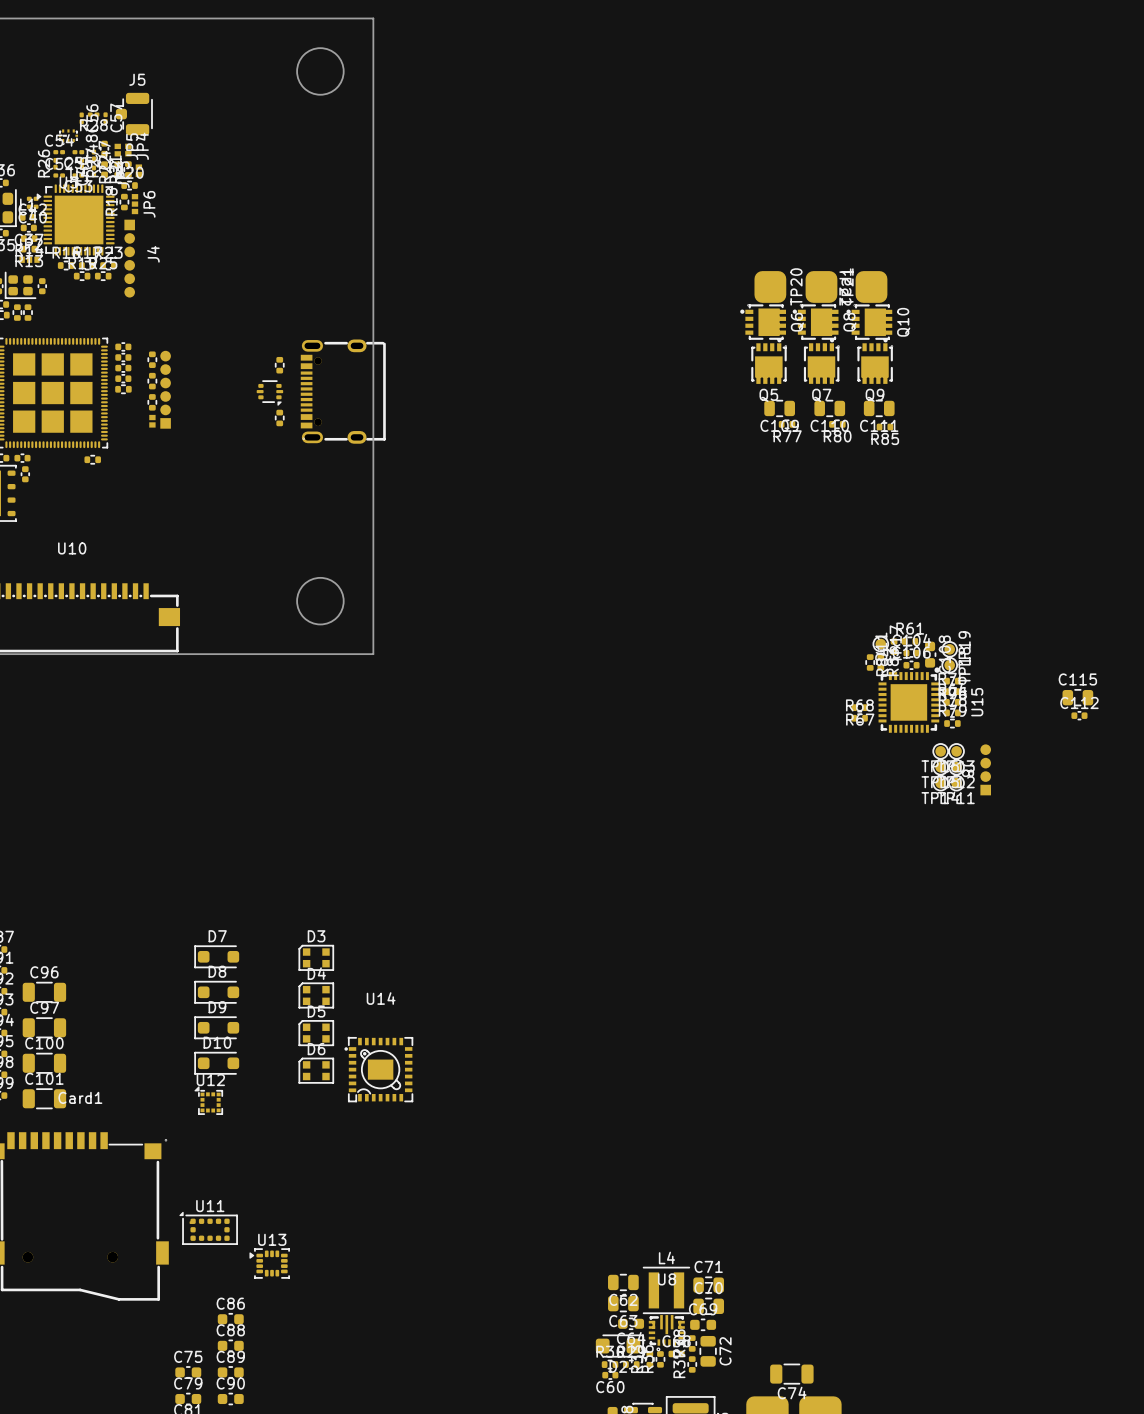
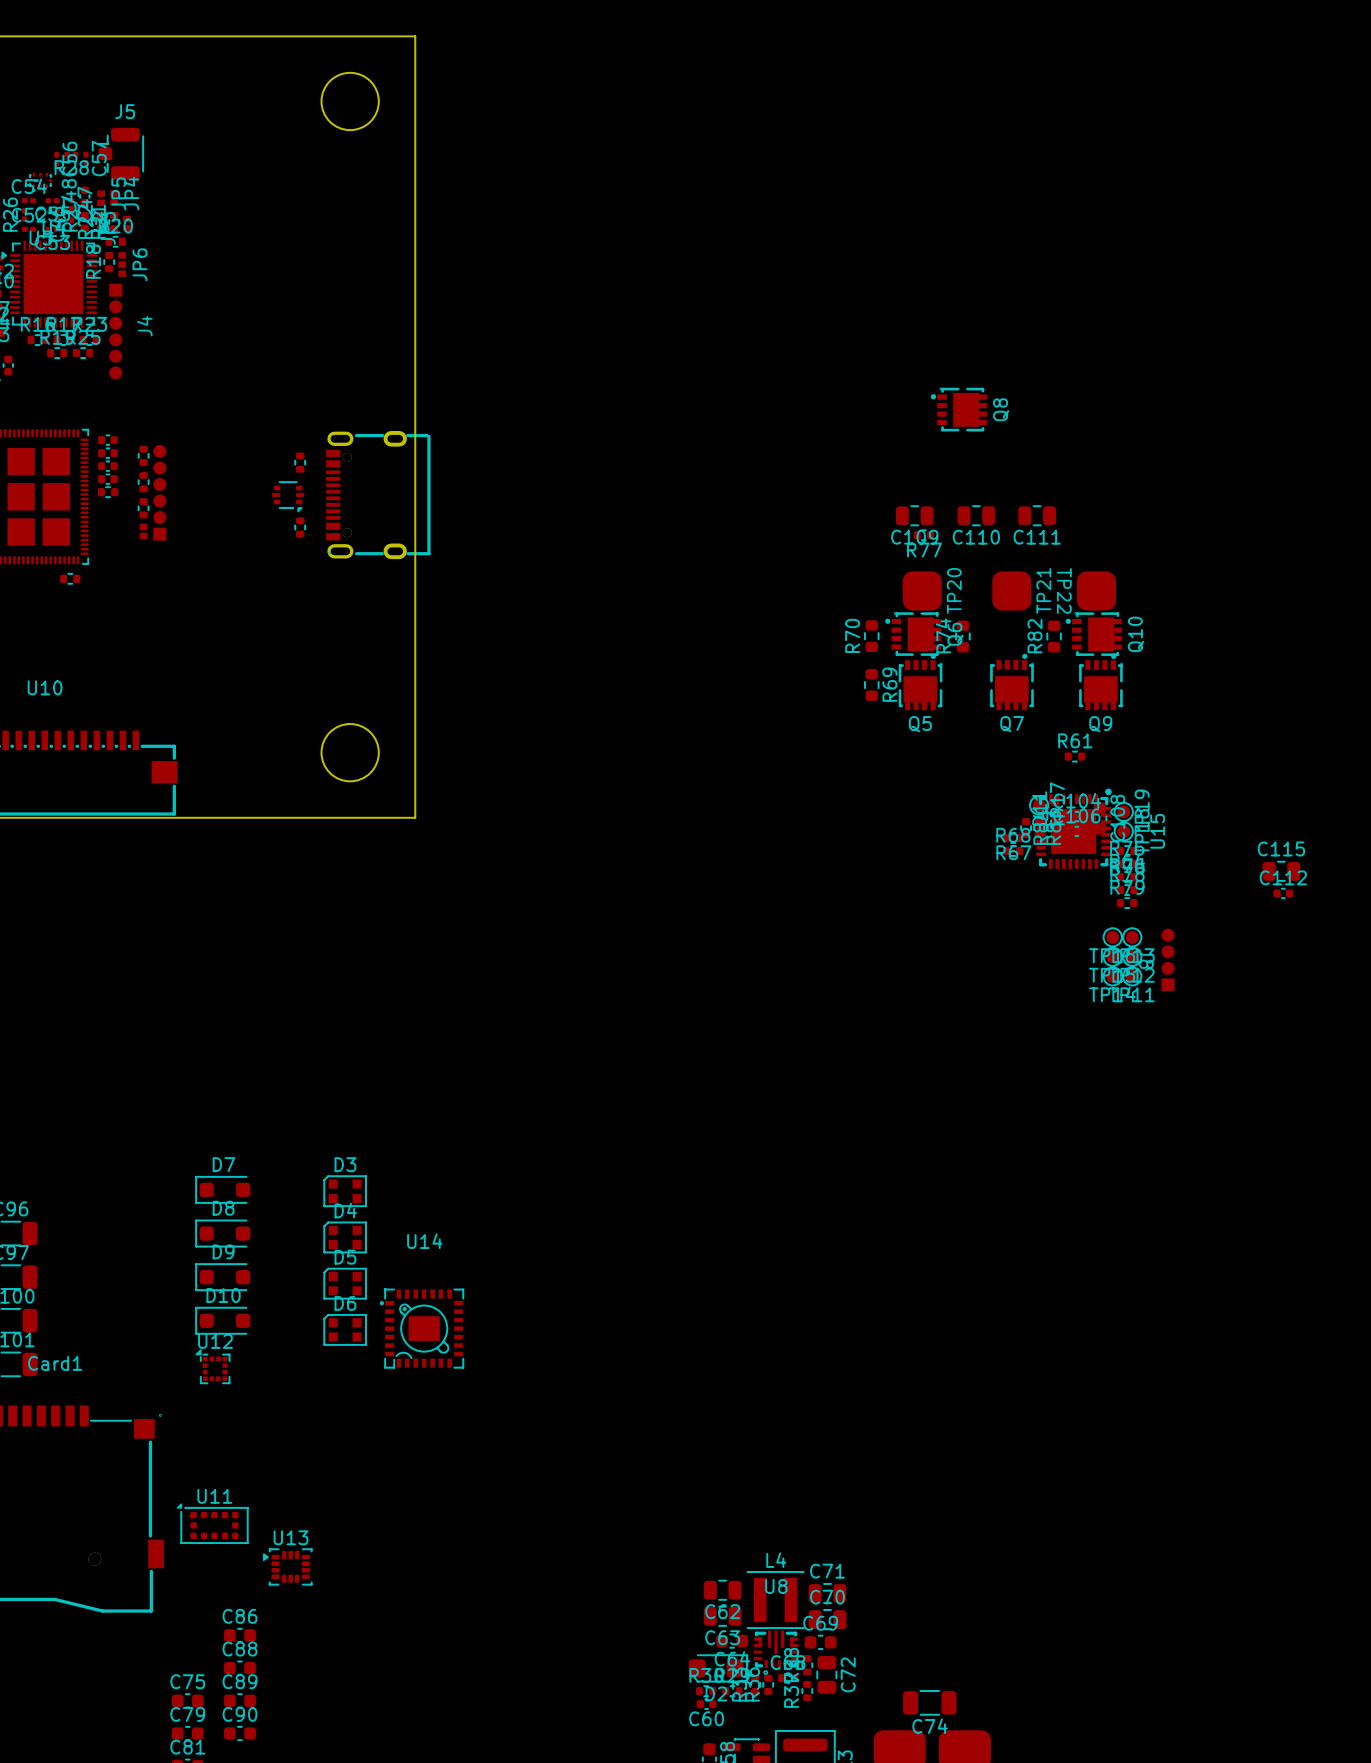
TP20 position: (770, 286) -> (922, 590)
TP21 position: (821, 286) -> (1011, 590)
TP22 position: (871, 286) -> (1096, 590)
Q6 position: (763, 322) -> (913, 634)
Q10 position: (869, 322) -> (1093, 634)
Q7 position: (821, 360) -> (1011, 681)
Q5 position: (768, 361) -> (920, 681)
Q9 position: (875, 361) -> (1100, 681)
R80: (837, 424) -> none
R85: (884, 426) -> none
R70: none -> (871, 636)
R74: none -> (962, 636)
R82: none -> (1054, 636)
R69: none -> (871, 685)
R61 position: (909, 641) -> (1074, 756)
U15 position: (909, 700) -> (1074, 828)
R67 position: (859, 707) -> (1013, 837)
R68 position: (859, 718) -> (1013, 851)

